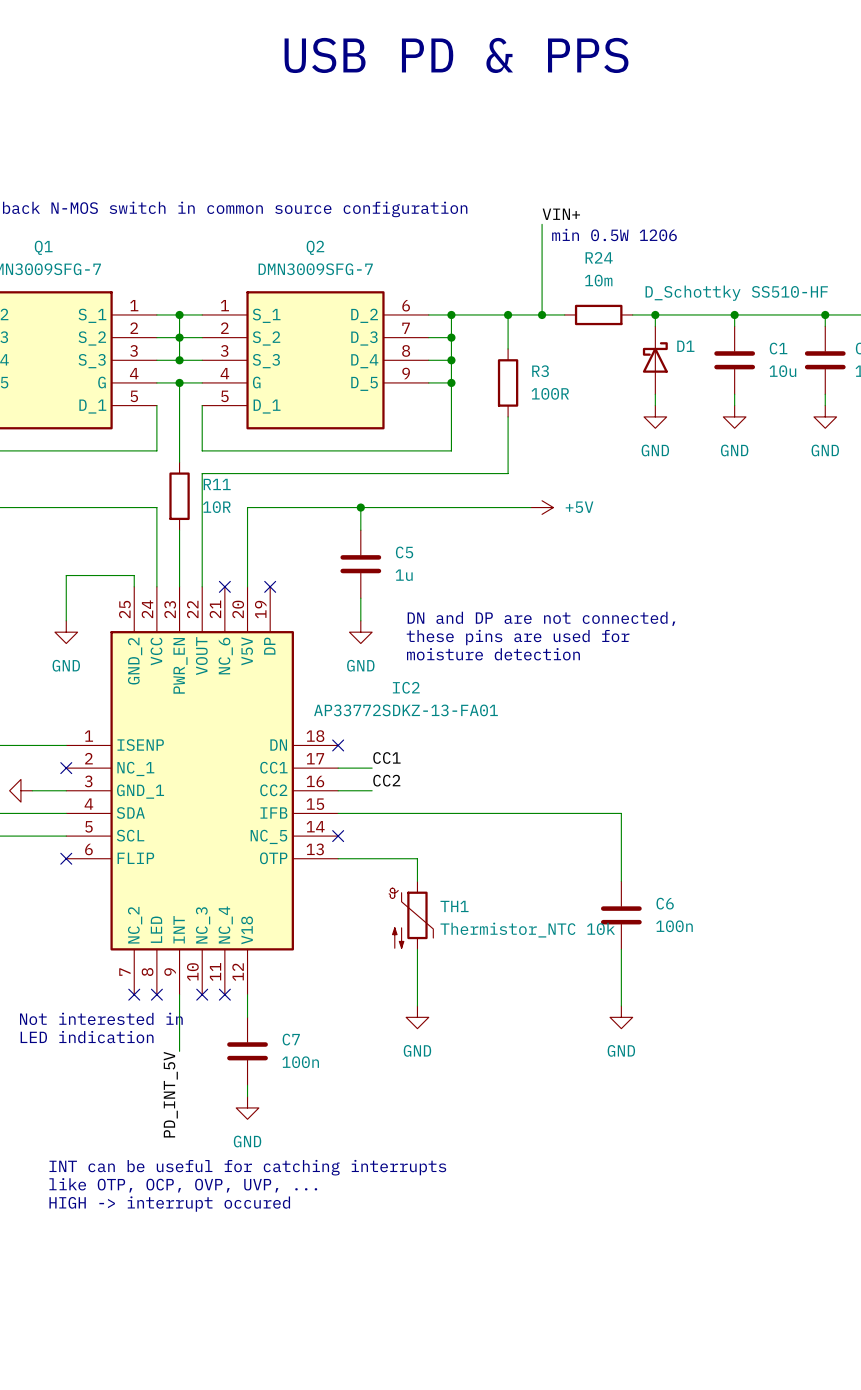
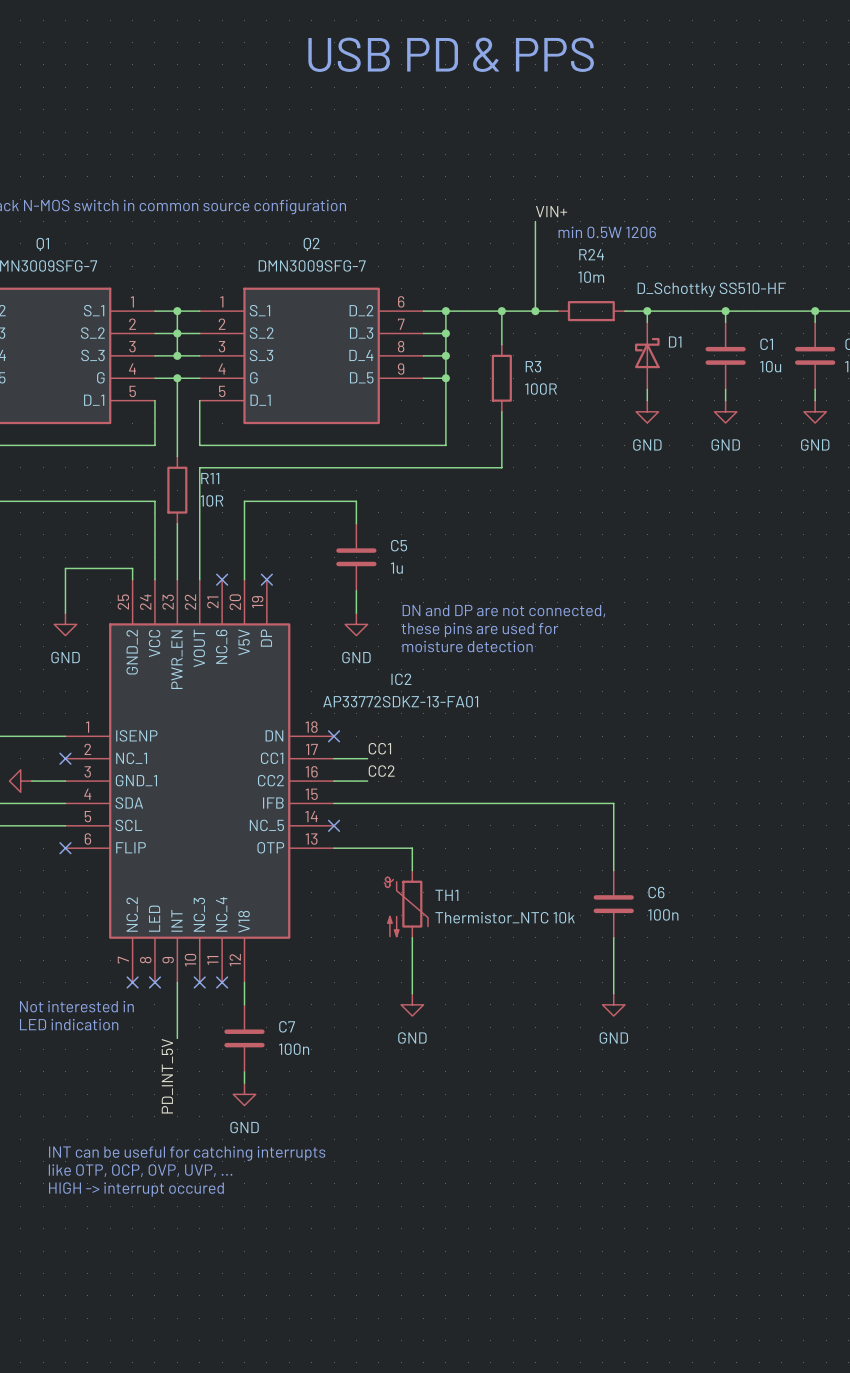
wire: (360, 507) (530, 507) -> none
junction: (360, 507) -> none
power symbol: +5V (542, 507) -> none

